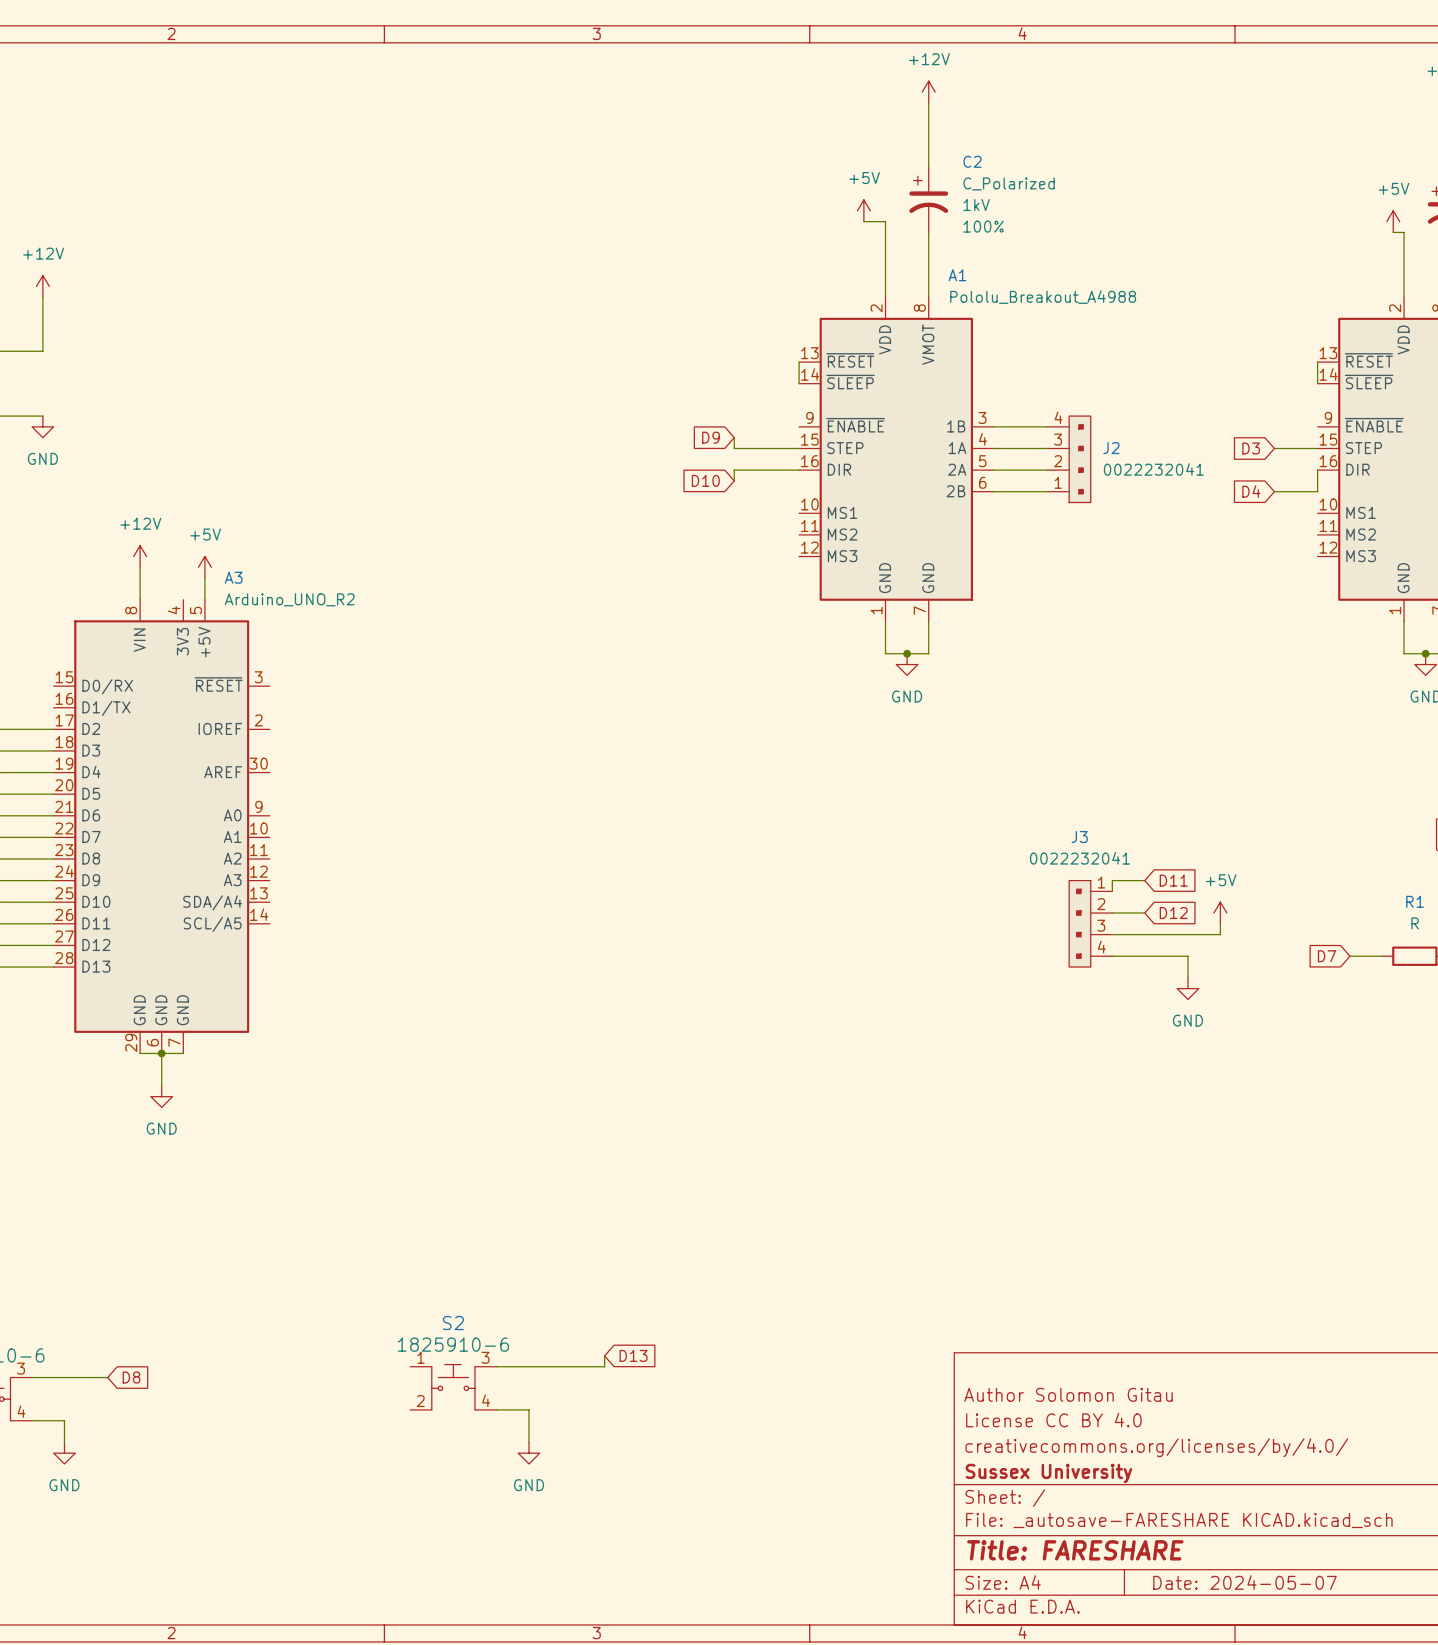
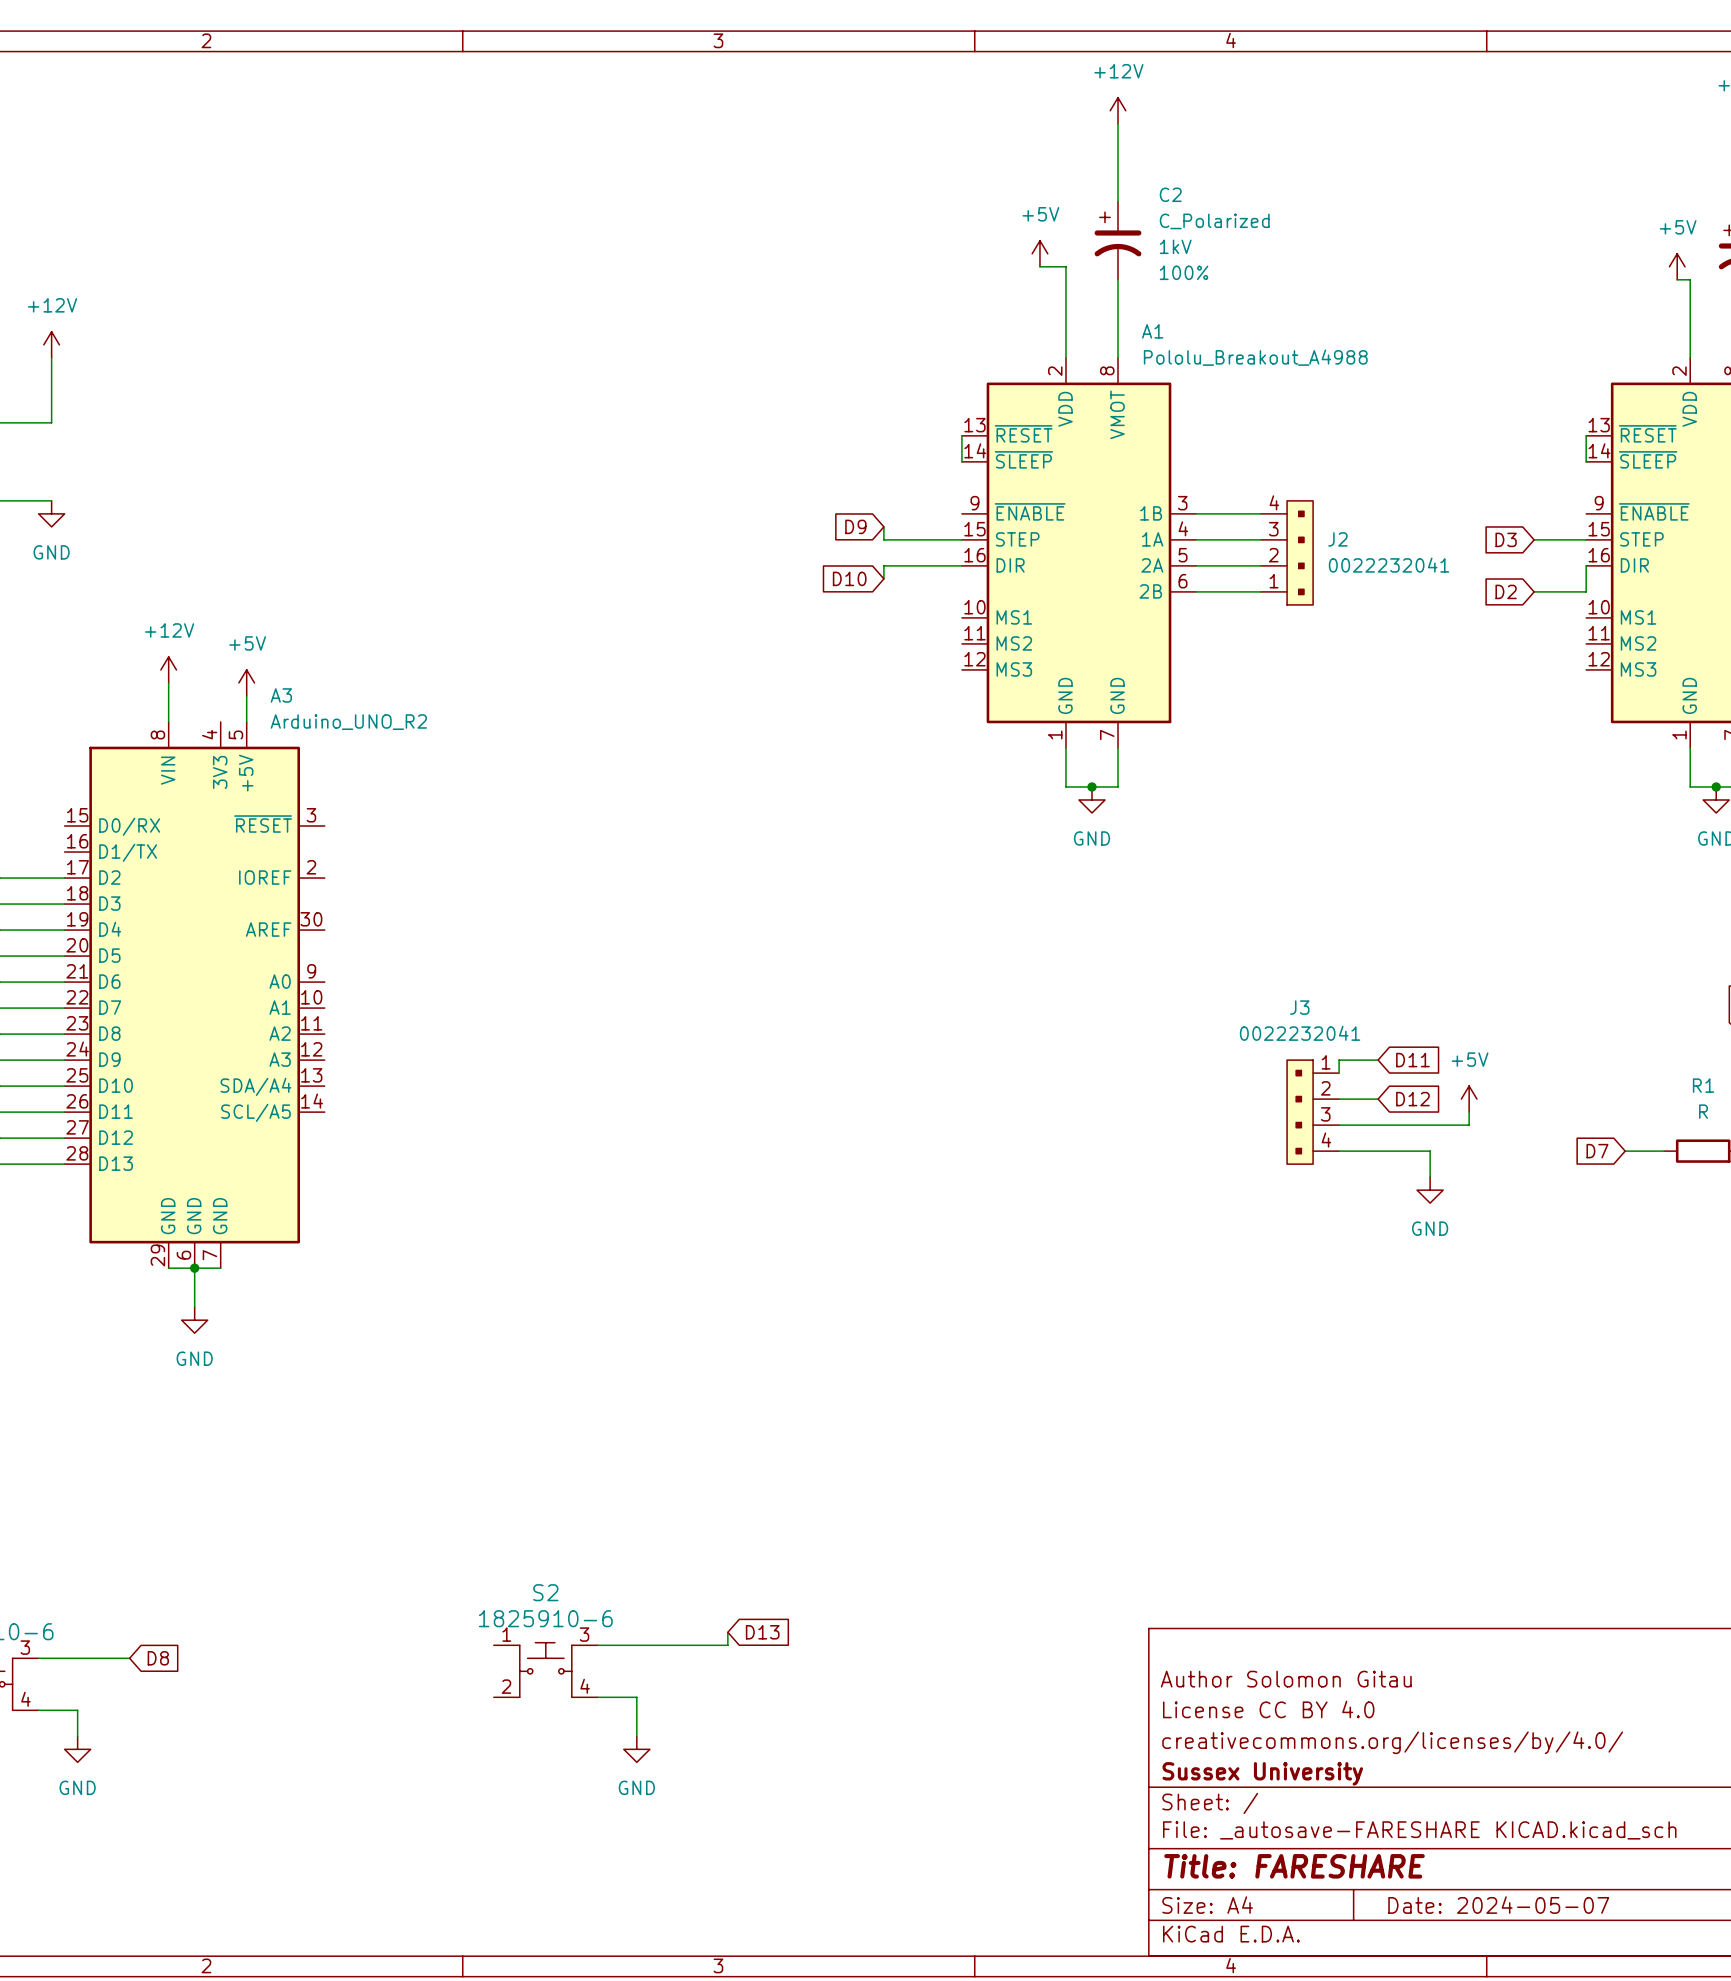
global label: D4 (1251, 491) -> D2 (1506, 591)

